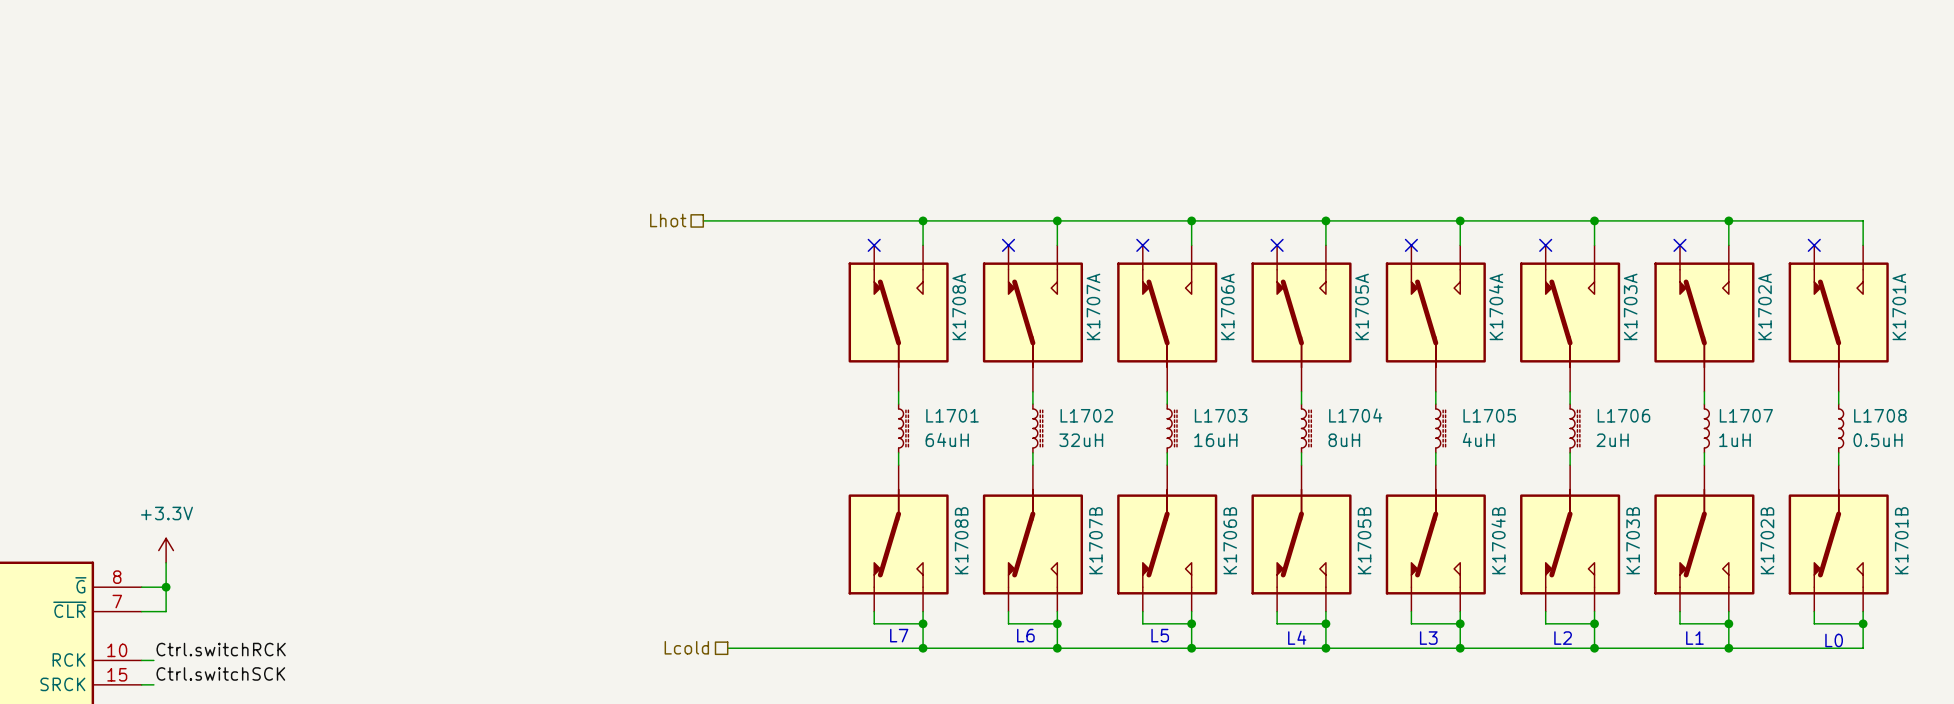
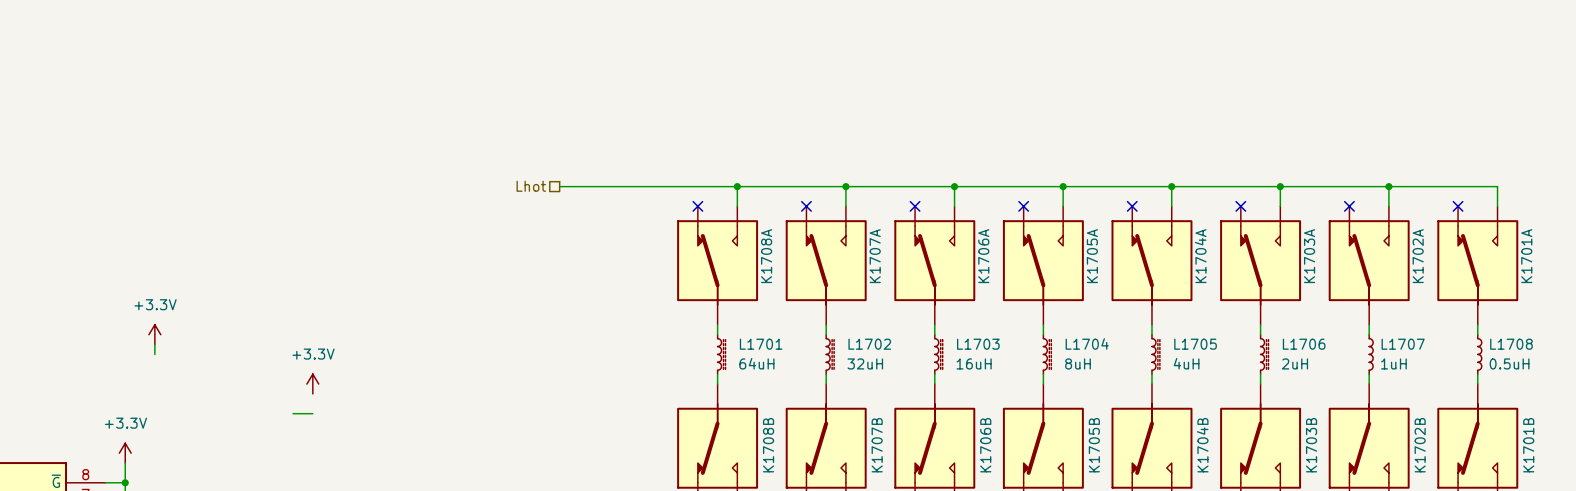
power symbol: none -> +3.3V (154, 334)
wire: none -> (154, 344) (154, 354)
power symbol: none -> +3.3V (312, 384)
wire: none -> (293, 413) (312, 413)

